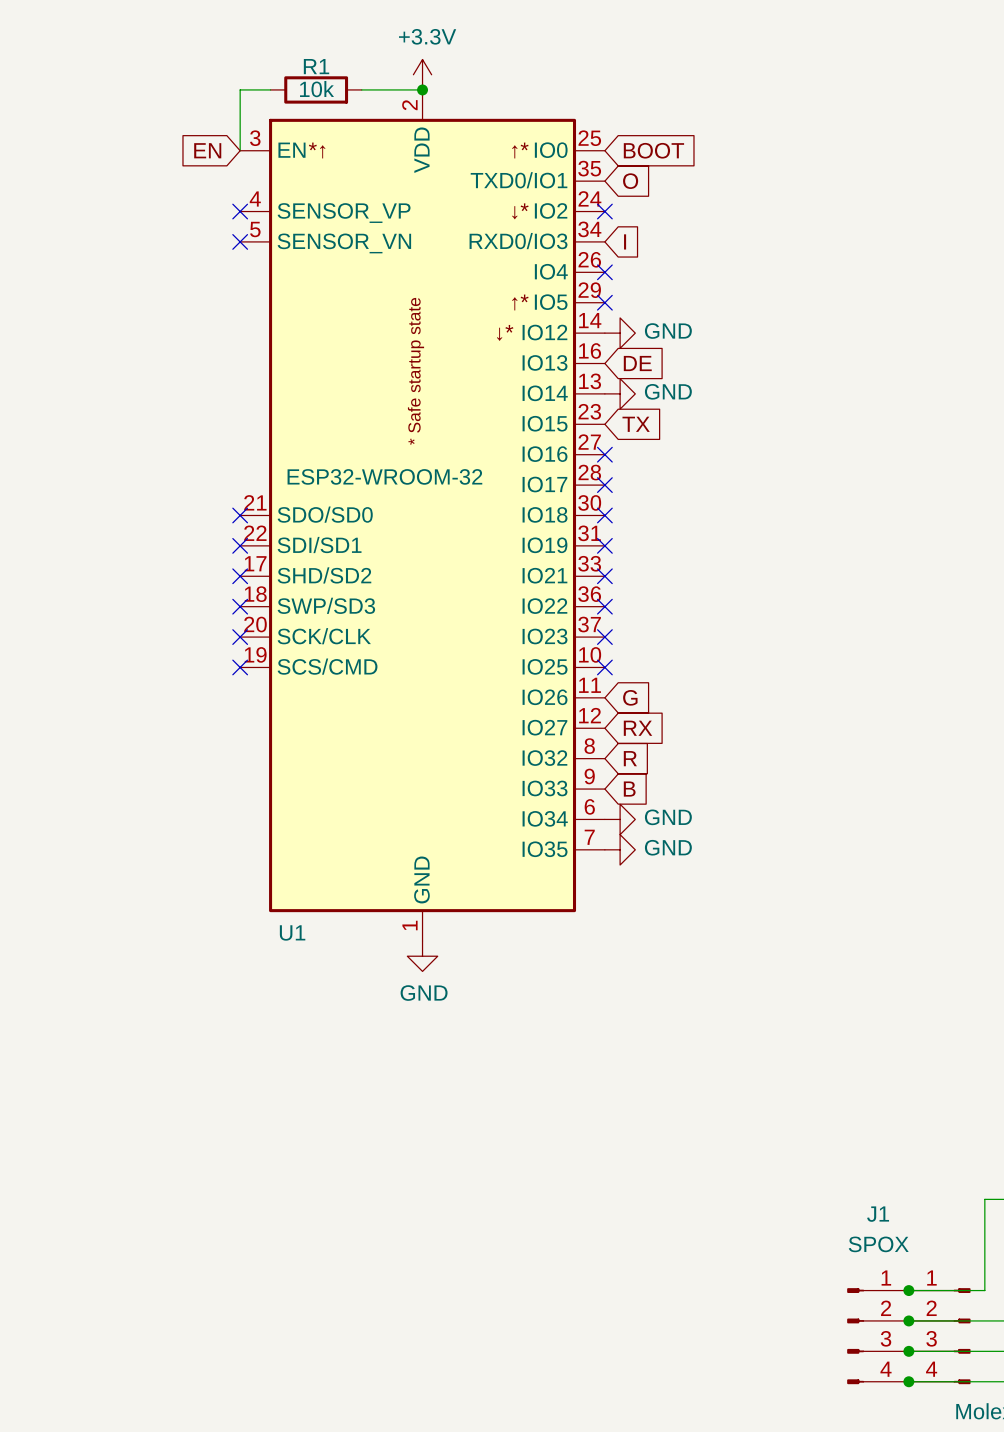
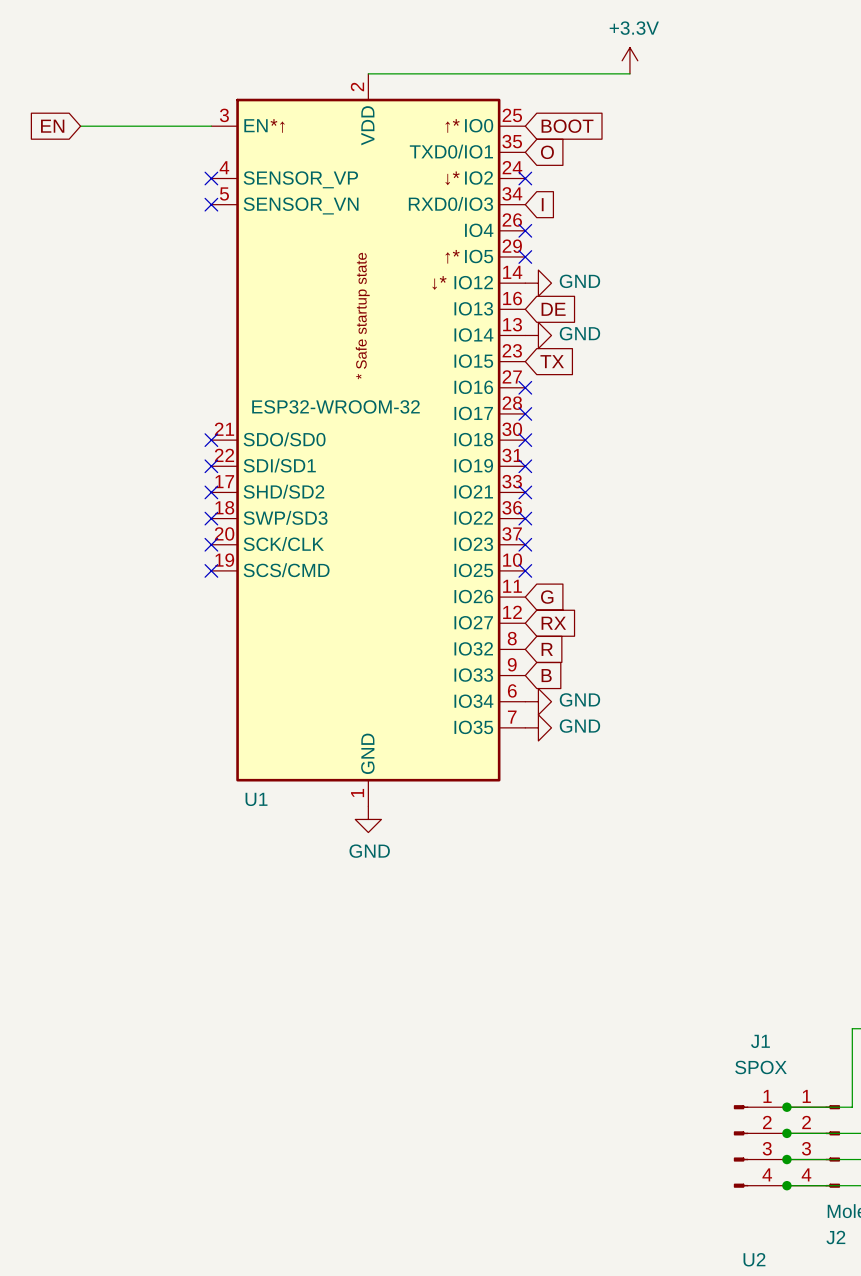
power symbol: +3.3V (422, 74) -> none
power symbol: none -> +3.3V (629, 60)
wire: (270, 89) (240, 89) (240, 150) -> (80, 126) (211, 126)
R1: 10k (316, 89) -> none
wire: (361, 89) (422, 89) -> (629, 73) (368, 73)
junction: (422, 89) -> none
global label position: EN (207, 150) -> EN (52, 126)

